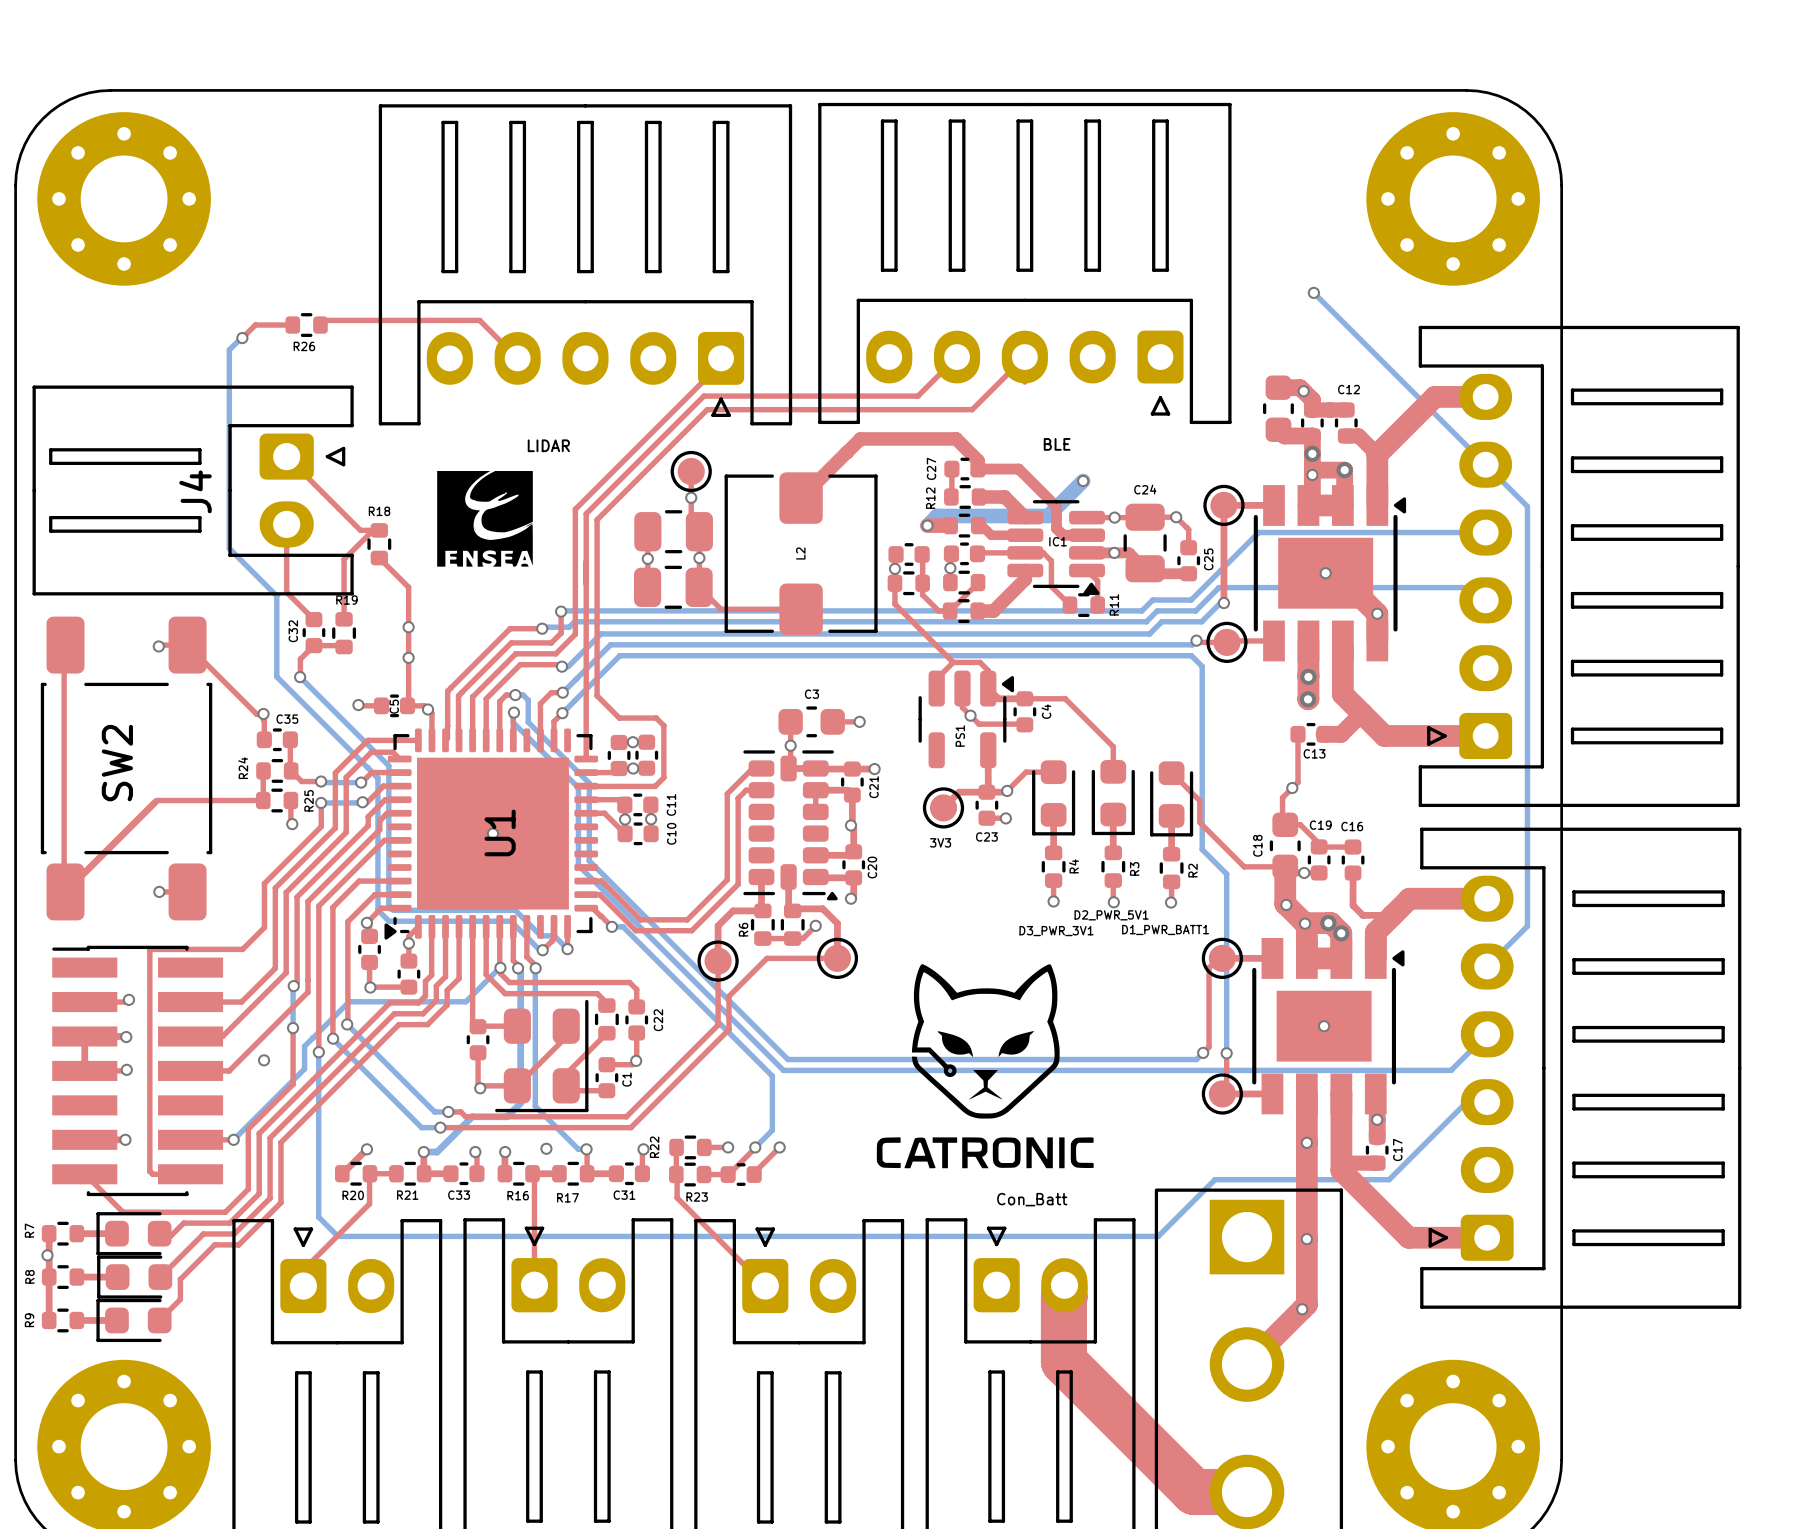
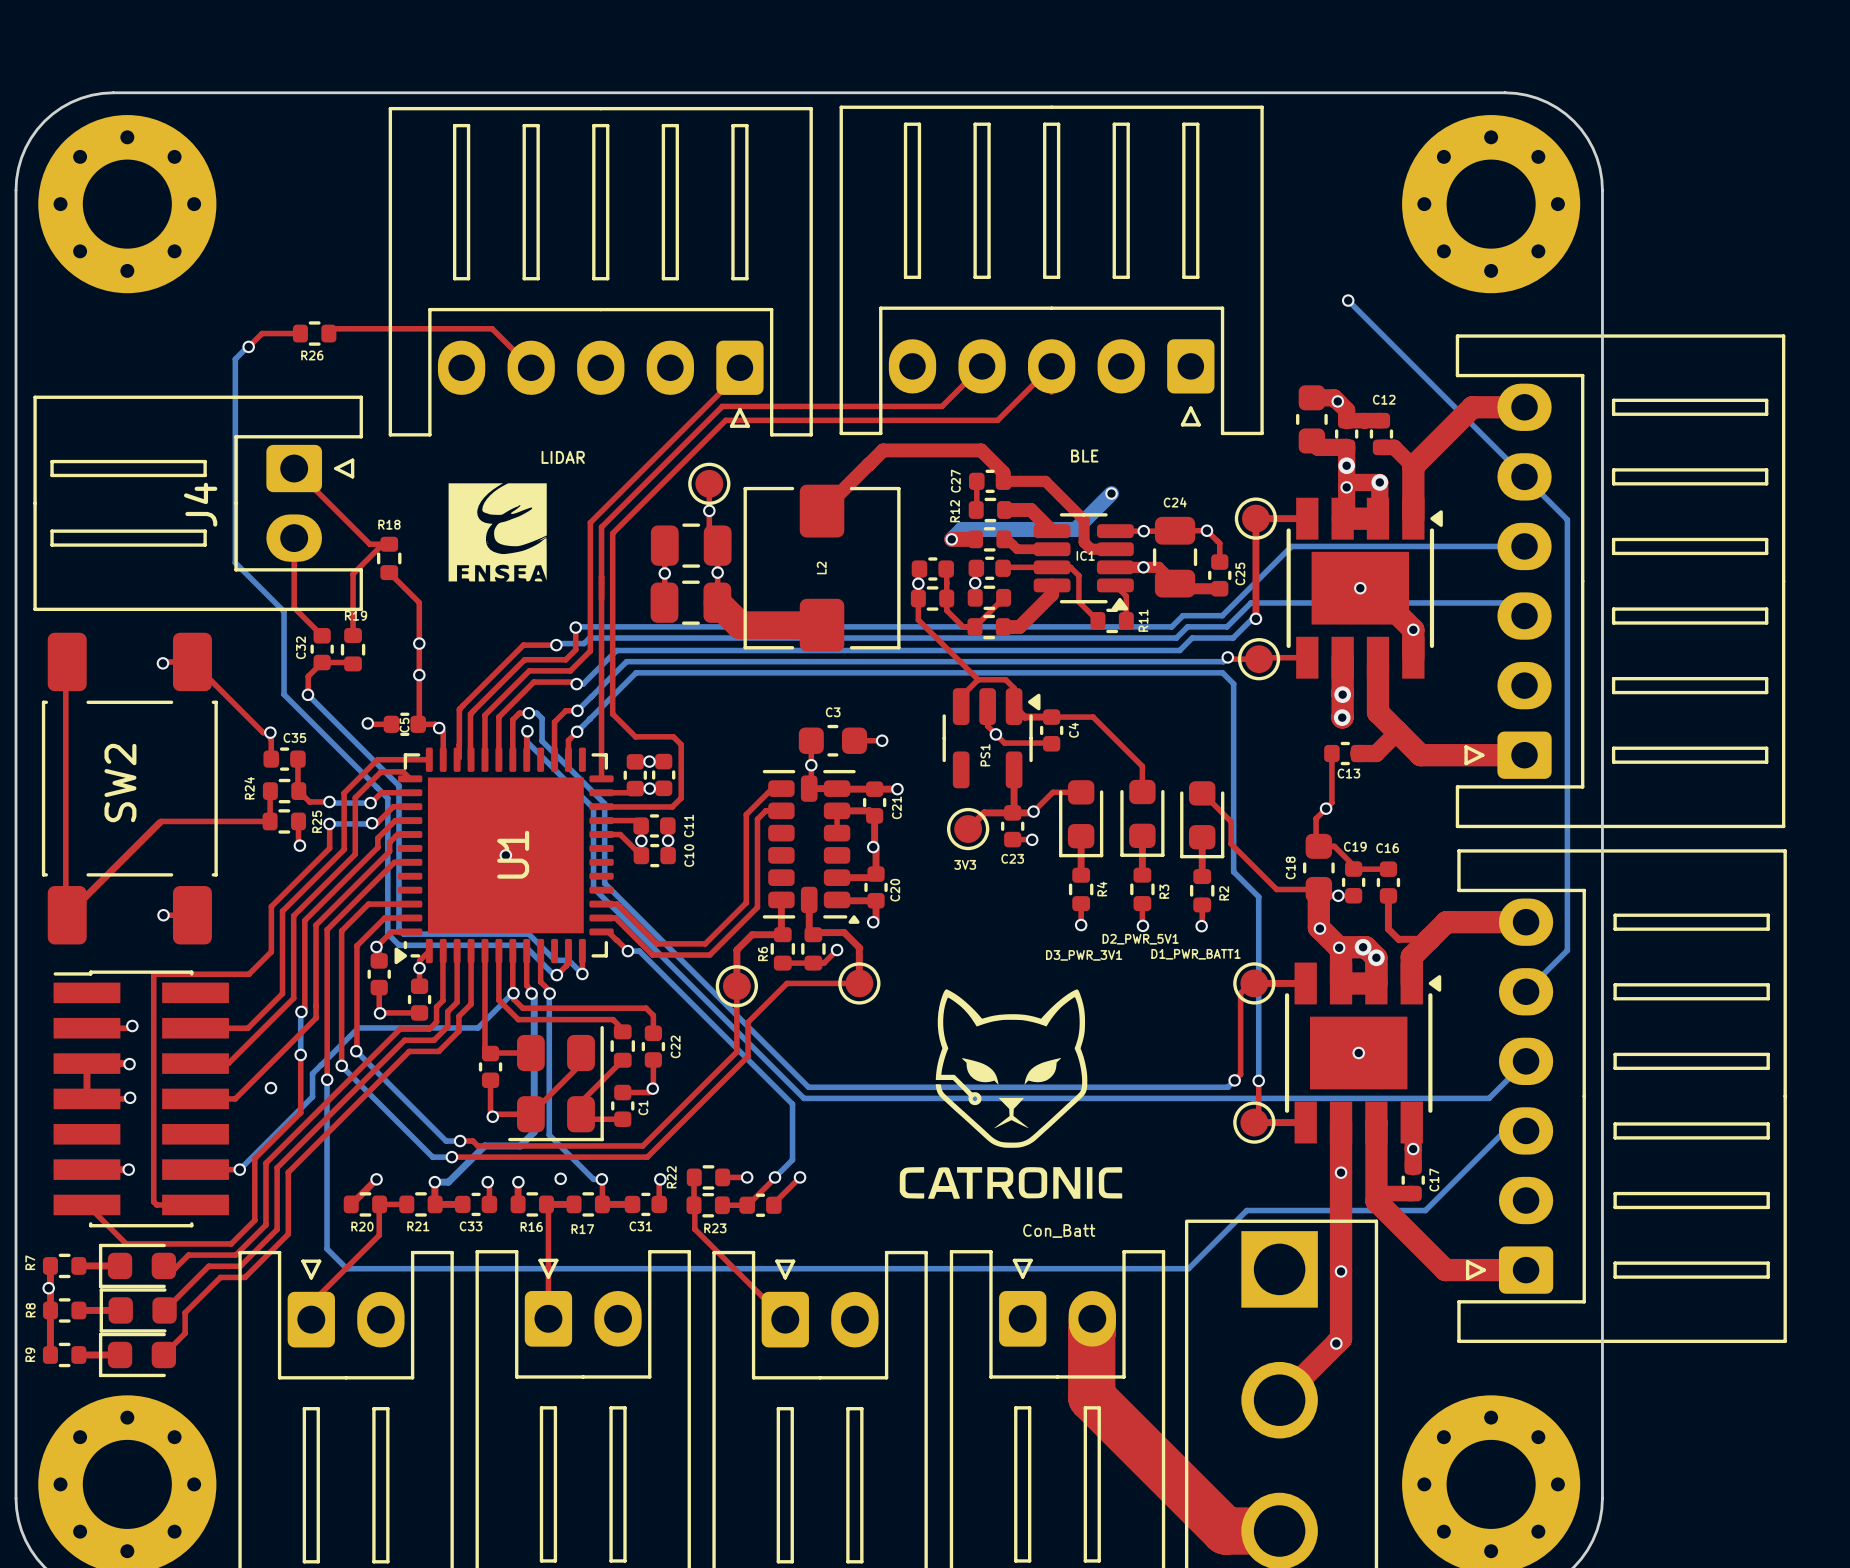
top track width: thin (699, 587) (721, 609) (801, 609) -> thick (717, 602) (739, 625) (822, 625)

